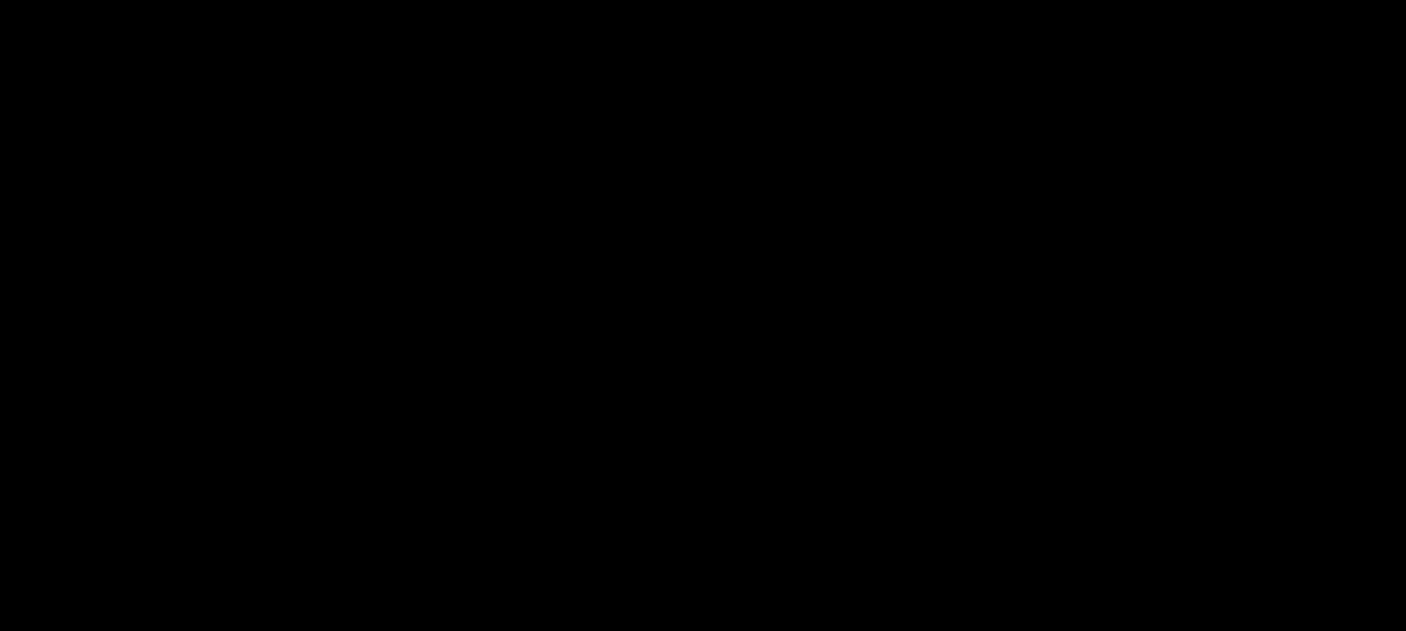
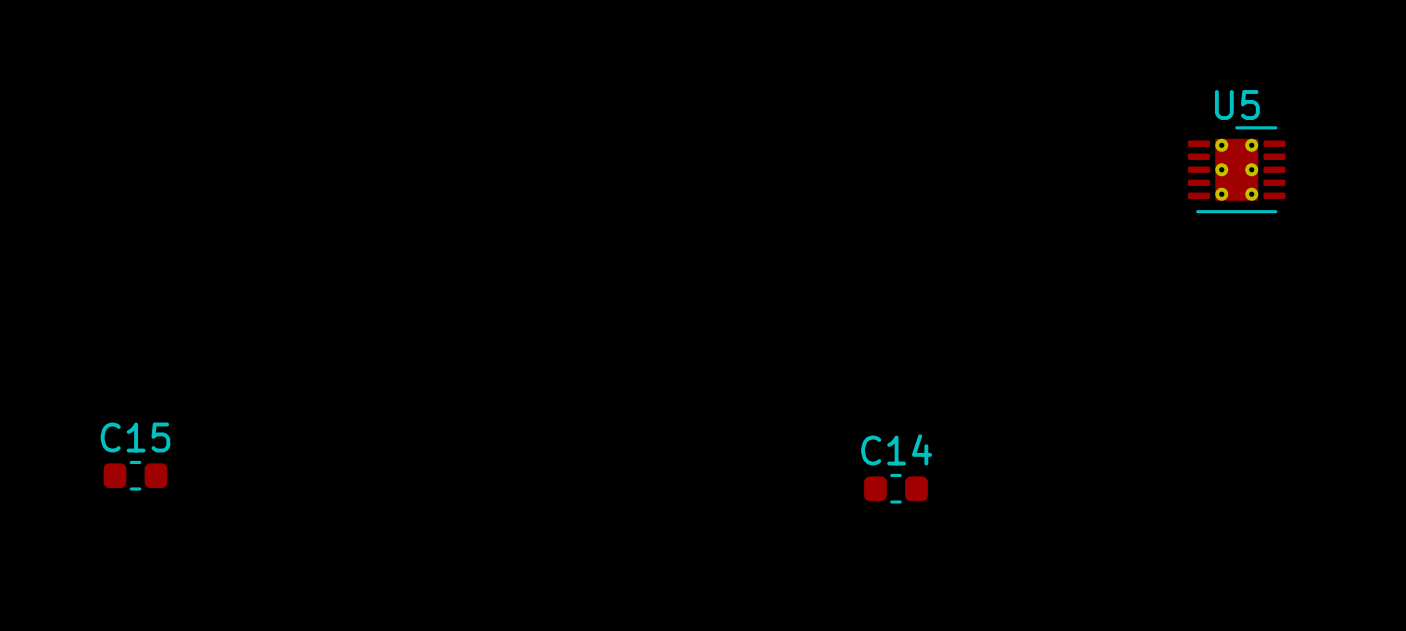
U5: none -> (1236, 169)
C15: none -> (135, 475)
C14: none -> (895, 488)

